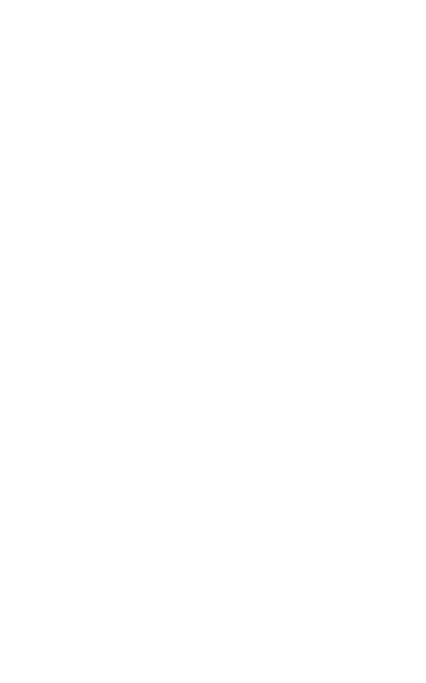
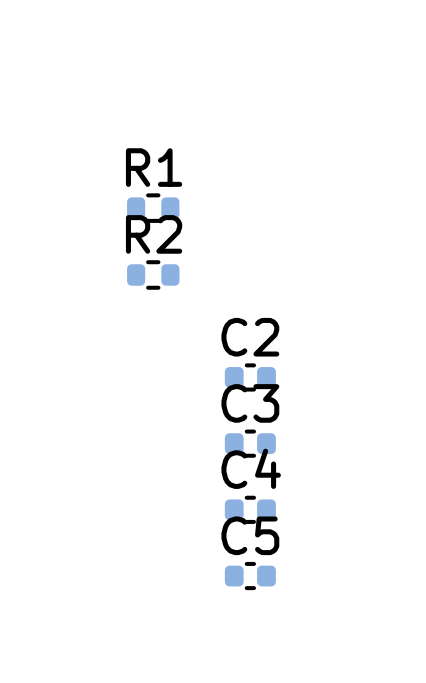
R1: none -> (153, 208)
R2: none -> (153, 274)
C2: none -> (250, 377)
C3: none -> (250, 443)
C4: none -> (250, 509)
C5: none -> (250, 576)

